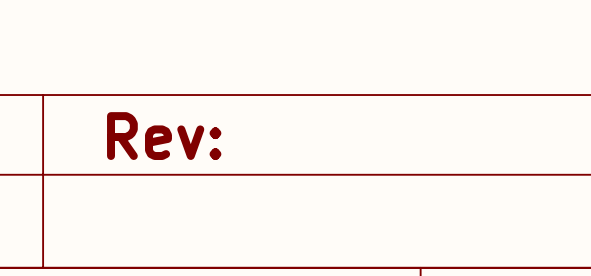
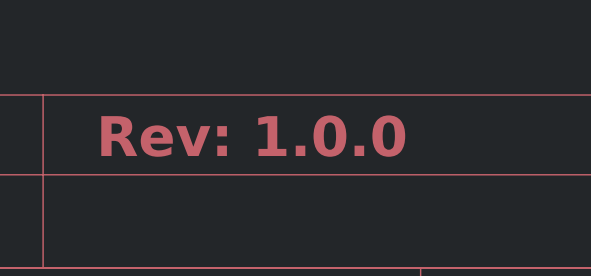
title block: Rev: (164, 136) -> Rev: 1.0.0 (253, 136)

